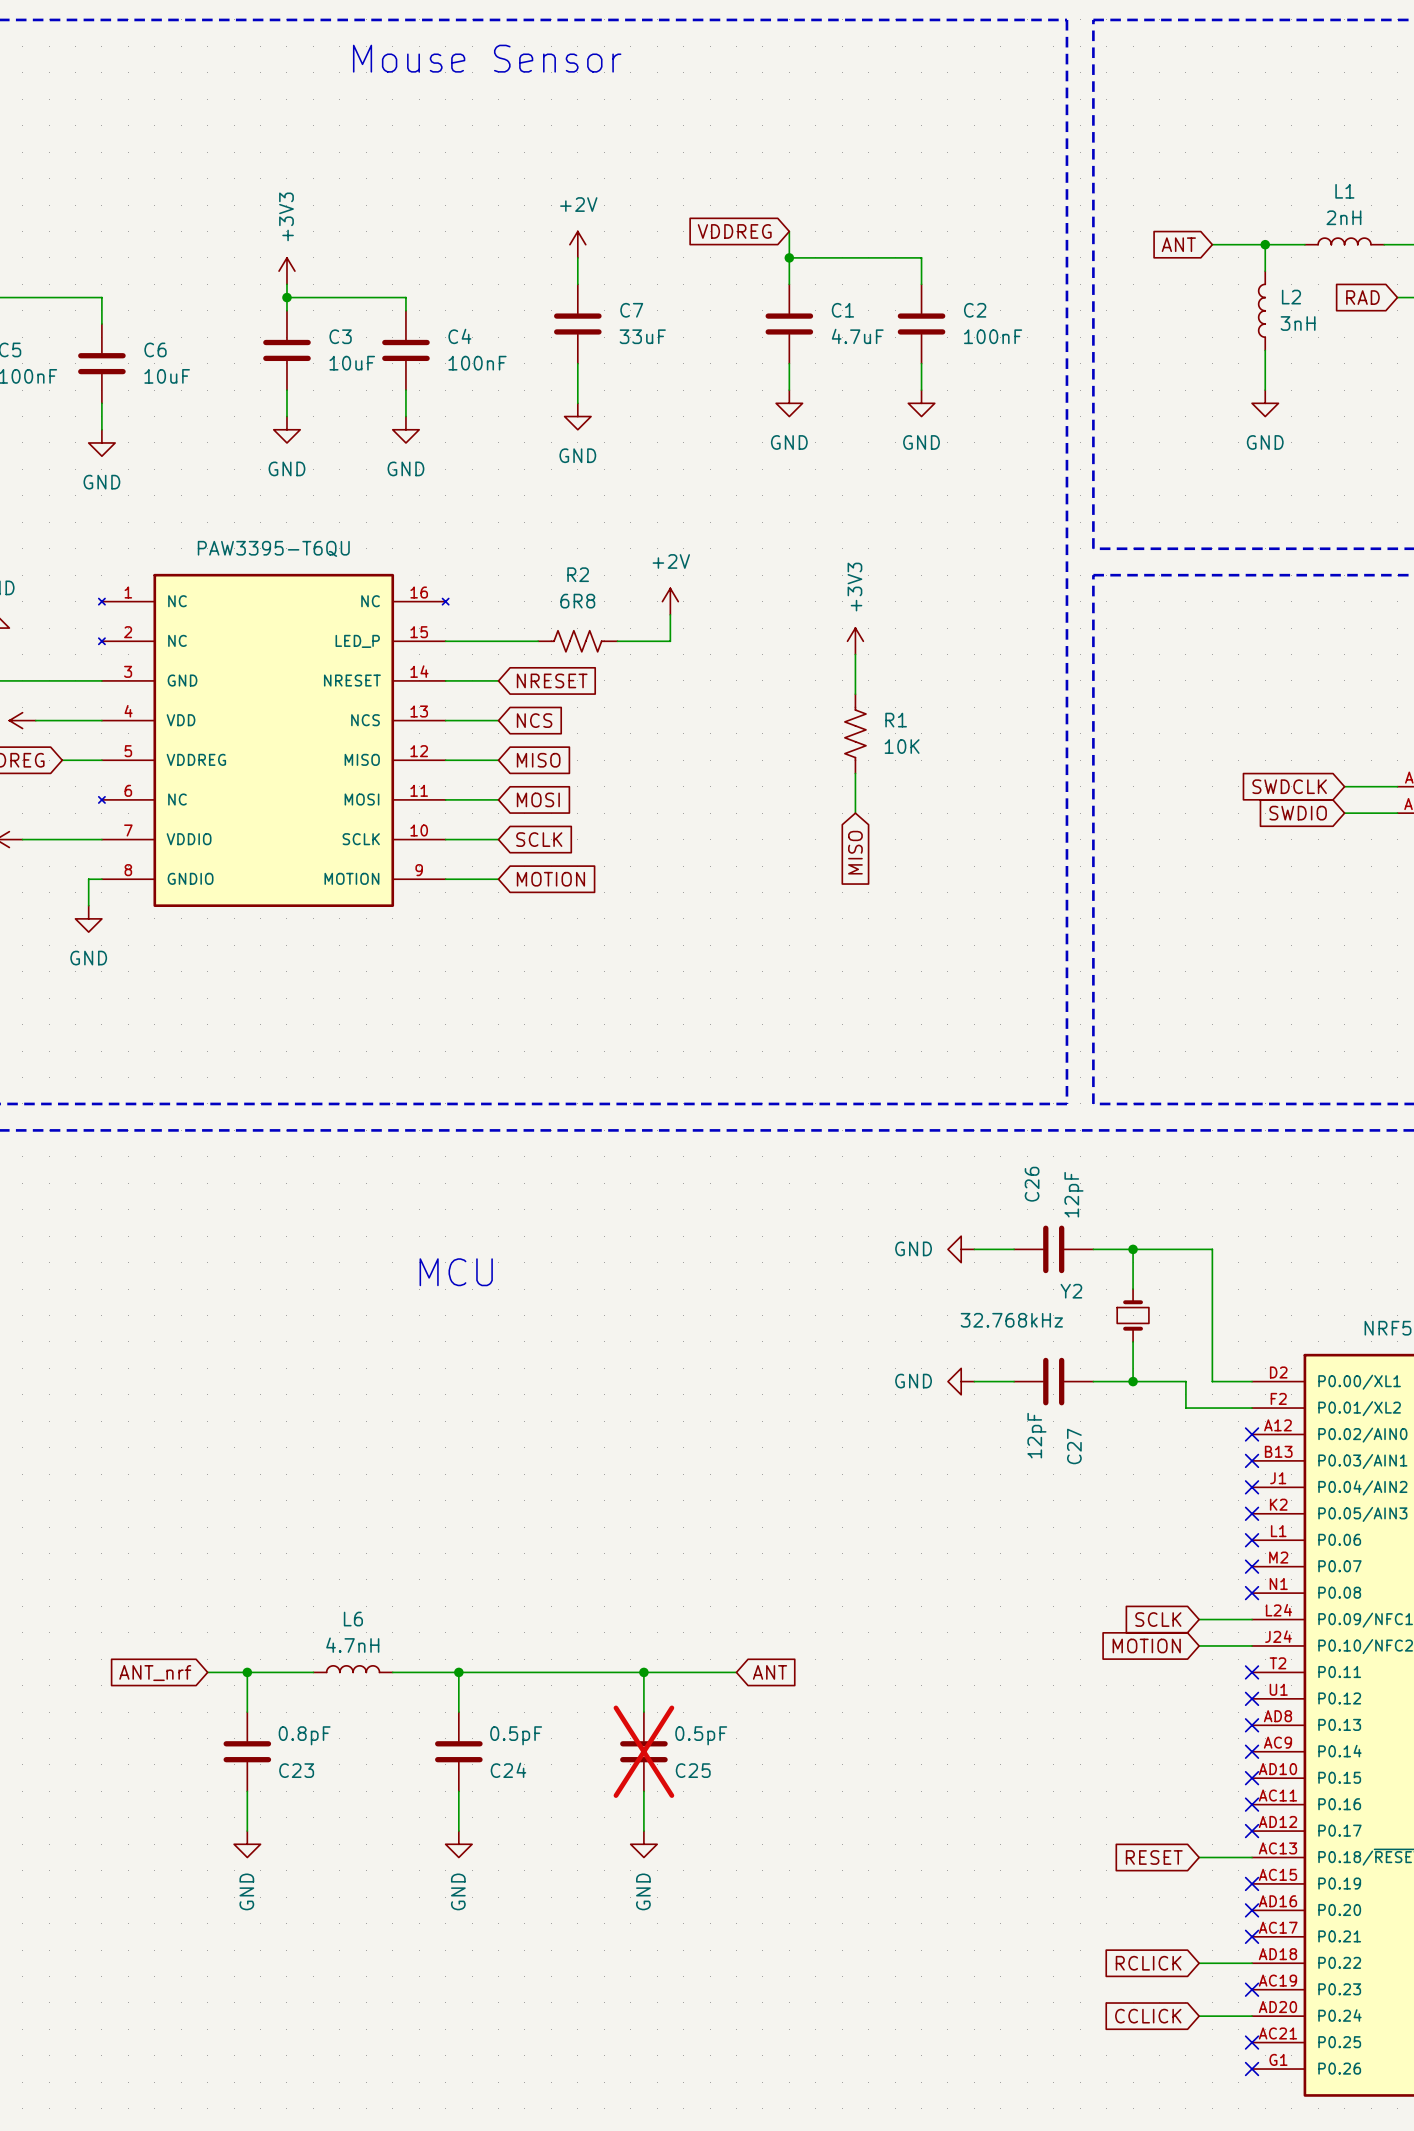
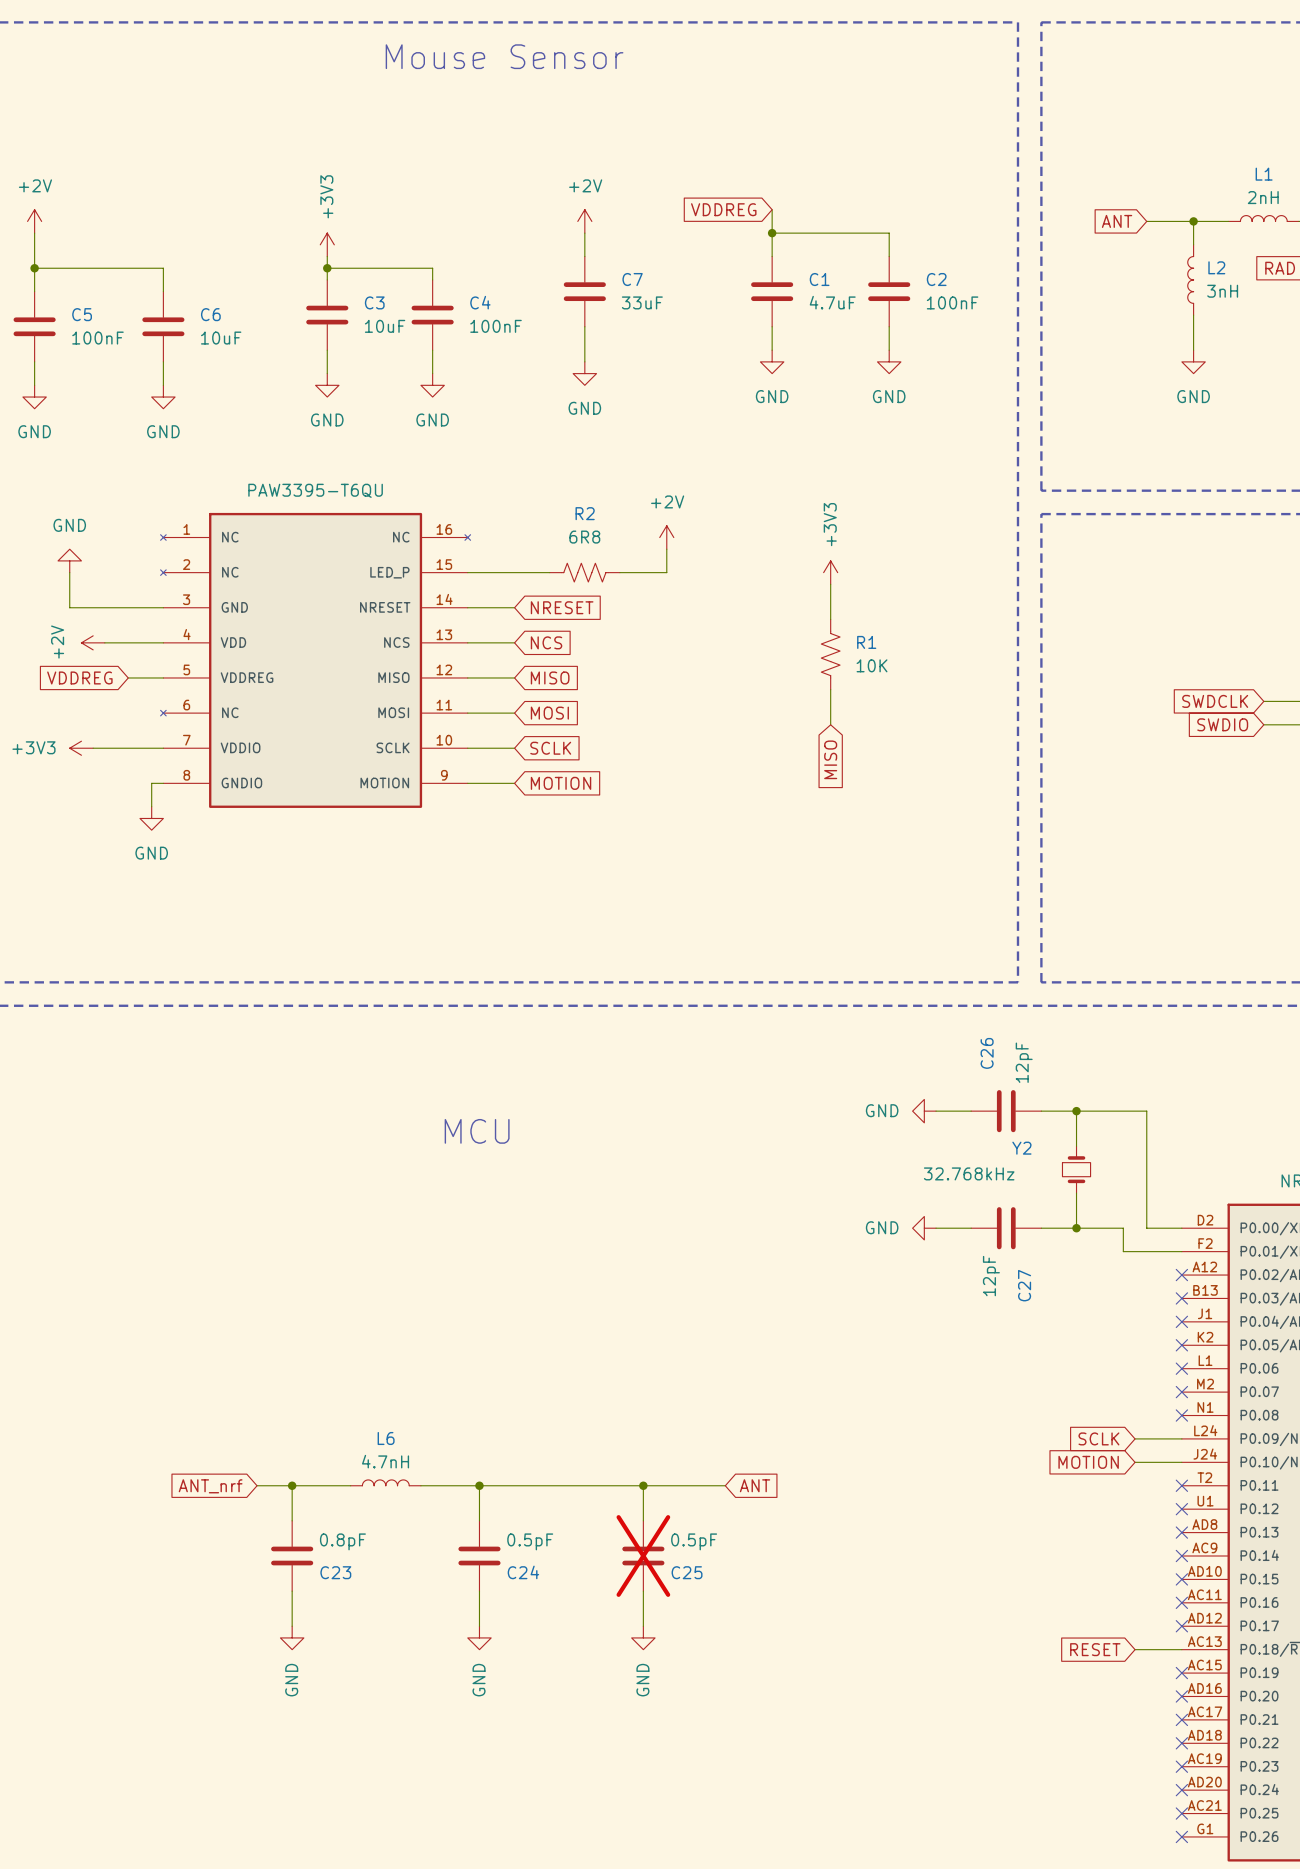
global label: RCLICK (1148, 1963) -> none
wire: (1199, 1963) (1252, 1963) -> none
no-connect mark: none -> (1181, 1743)
global label: CCLICK (1148, 2016) -> none
wire: (1199, 2016) (1252, 2016) -> none
no-connect mark: none -> (1181, 1790)

